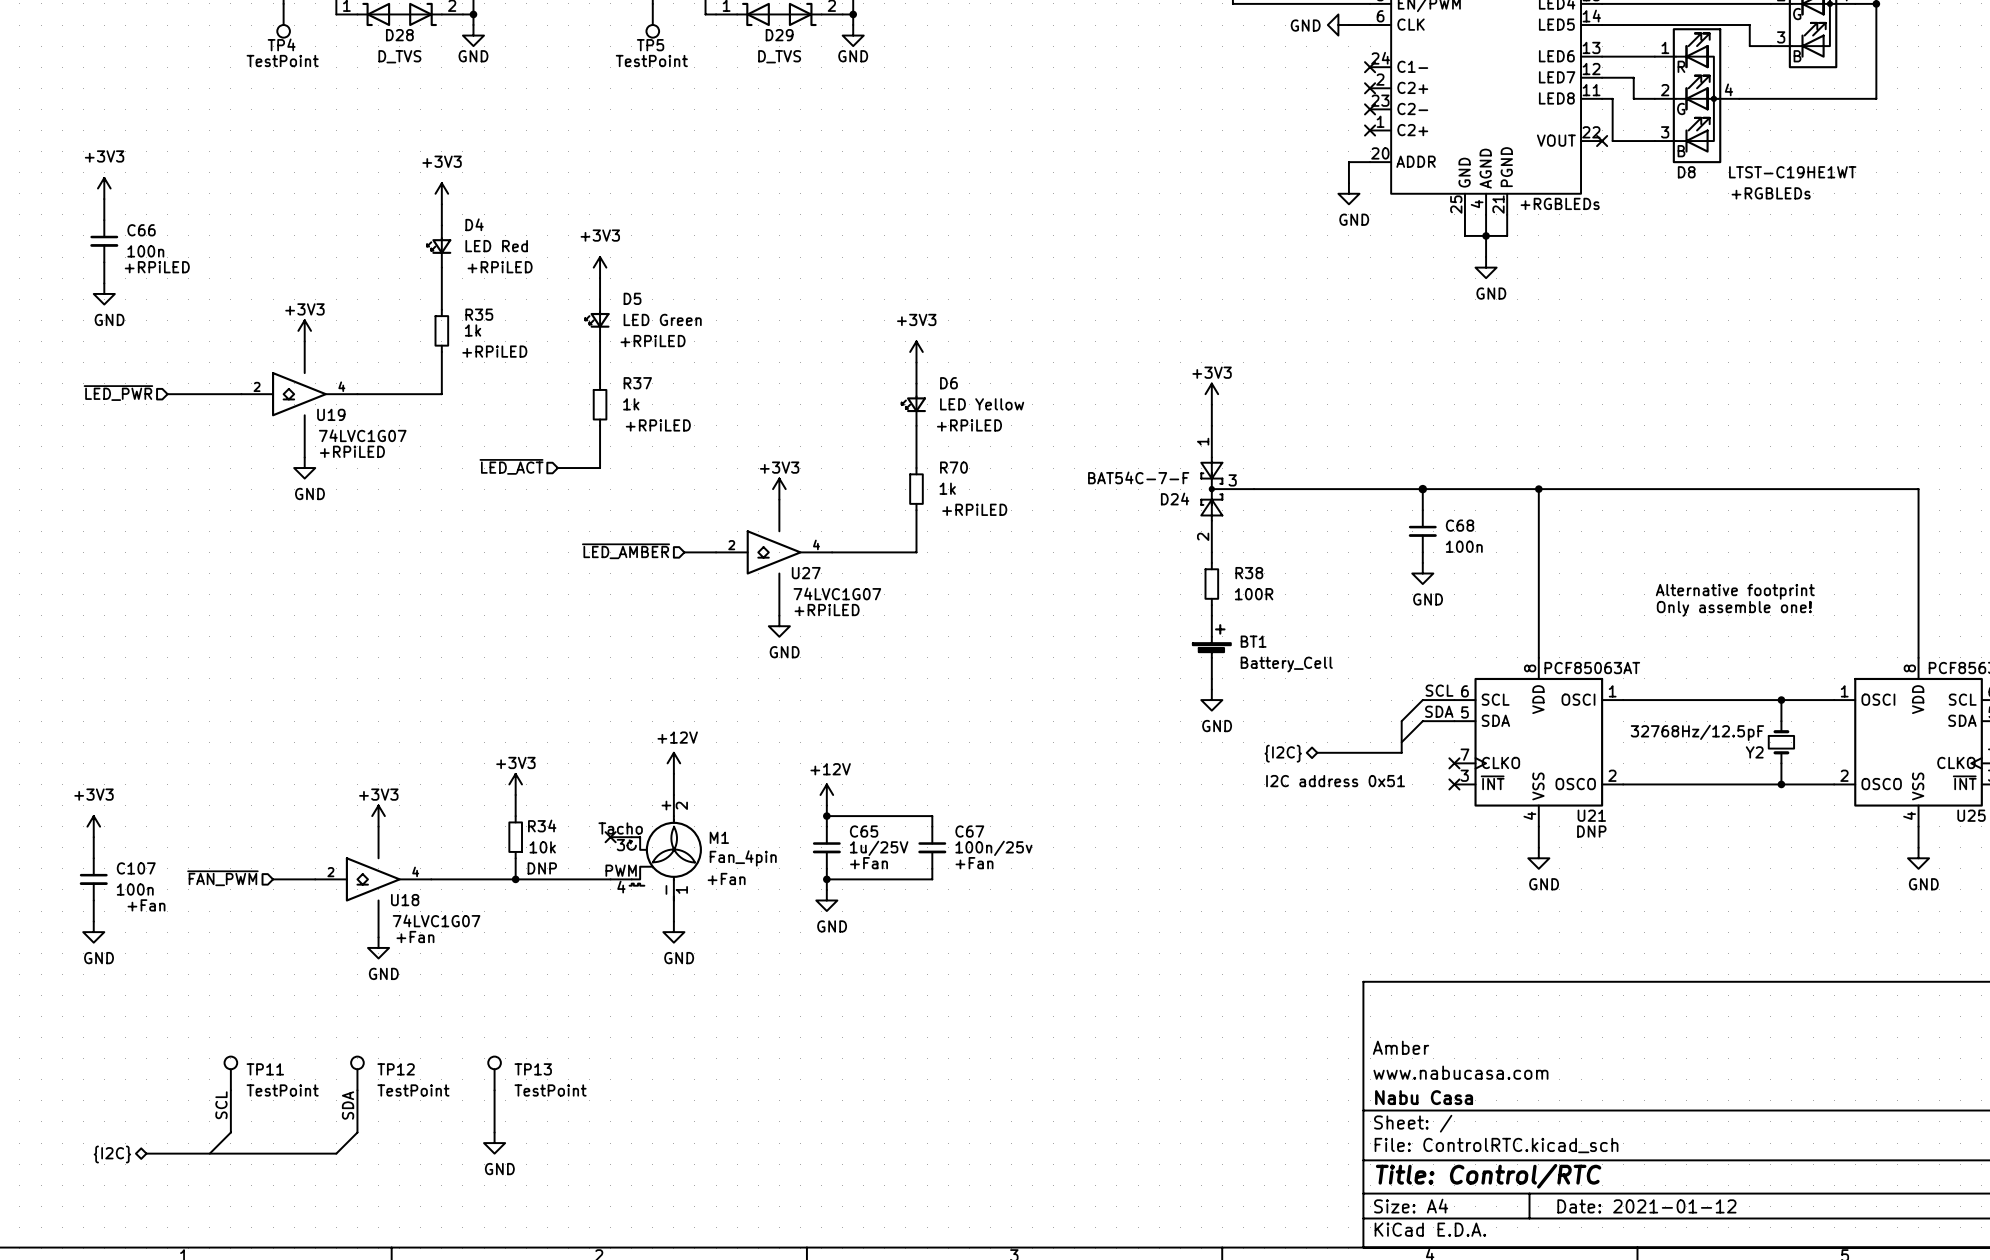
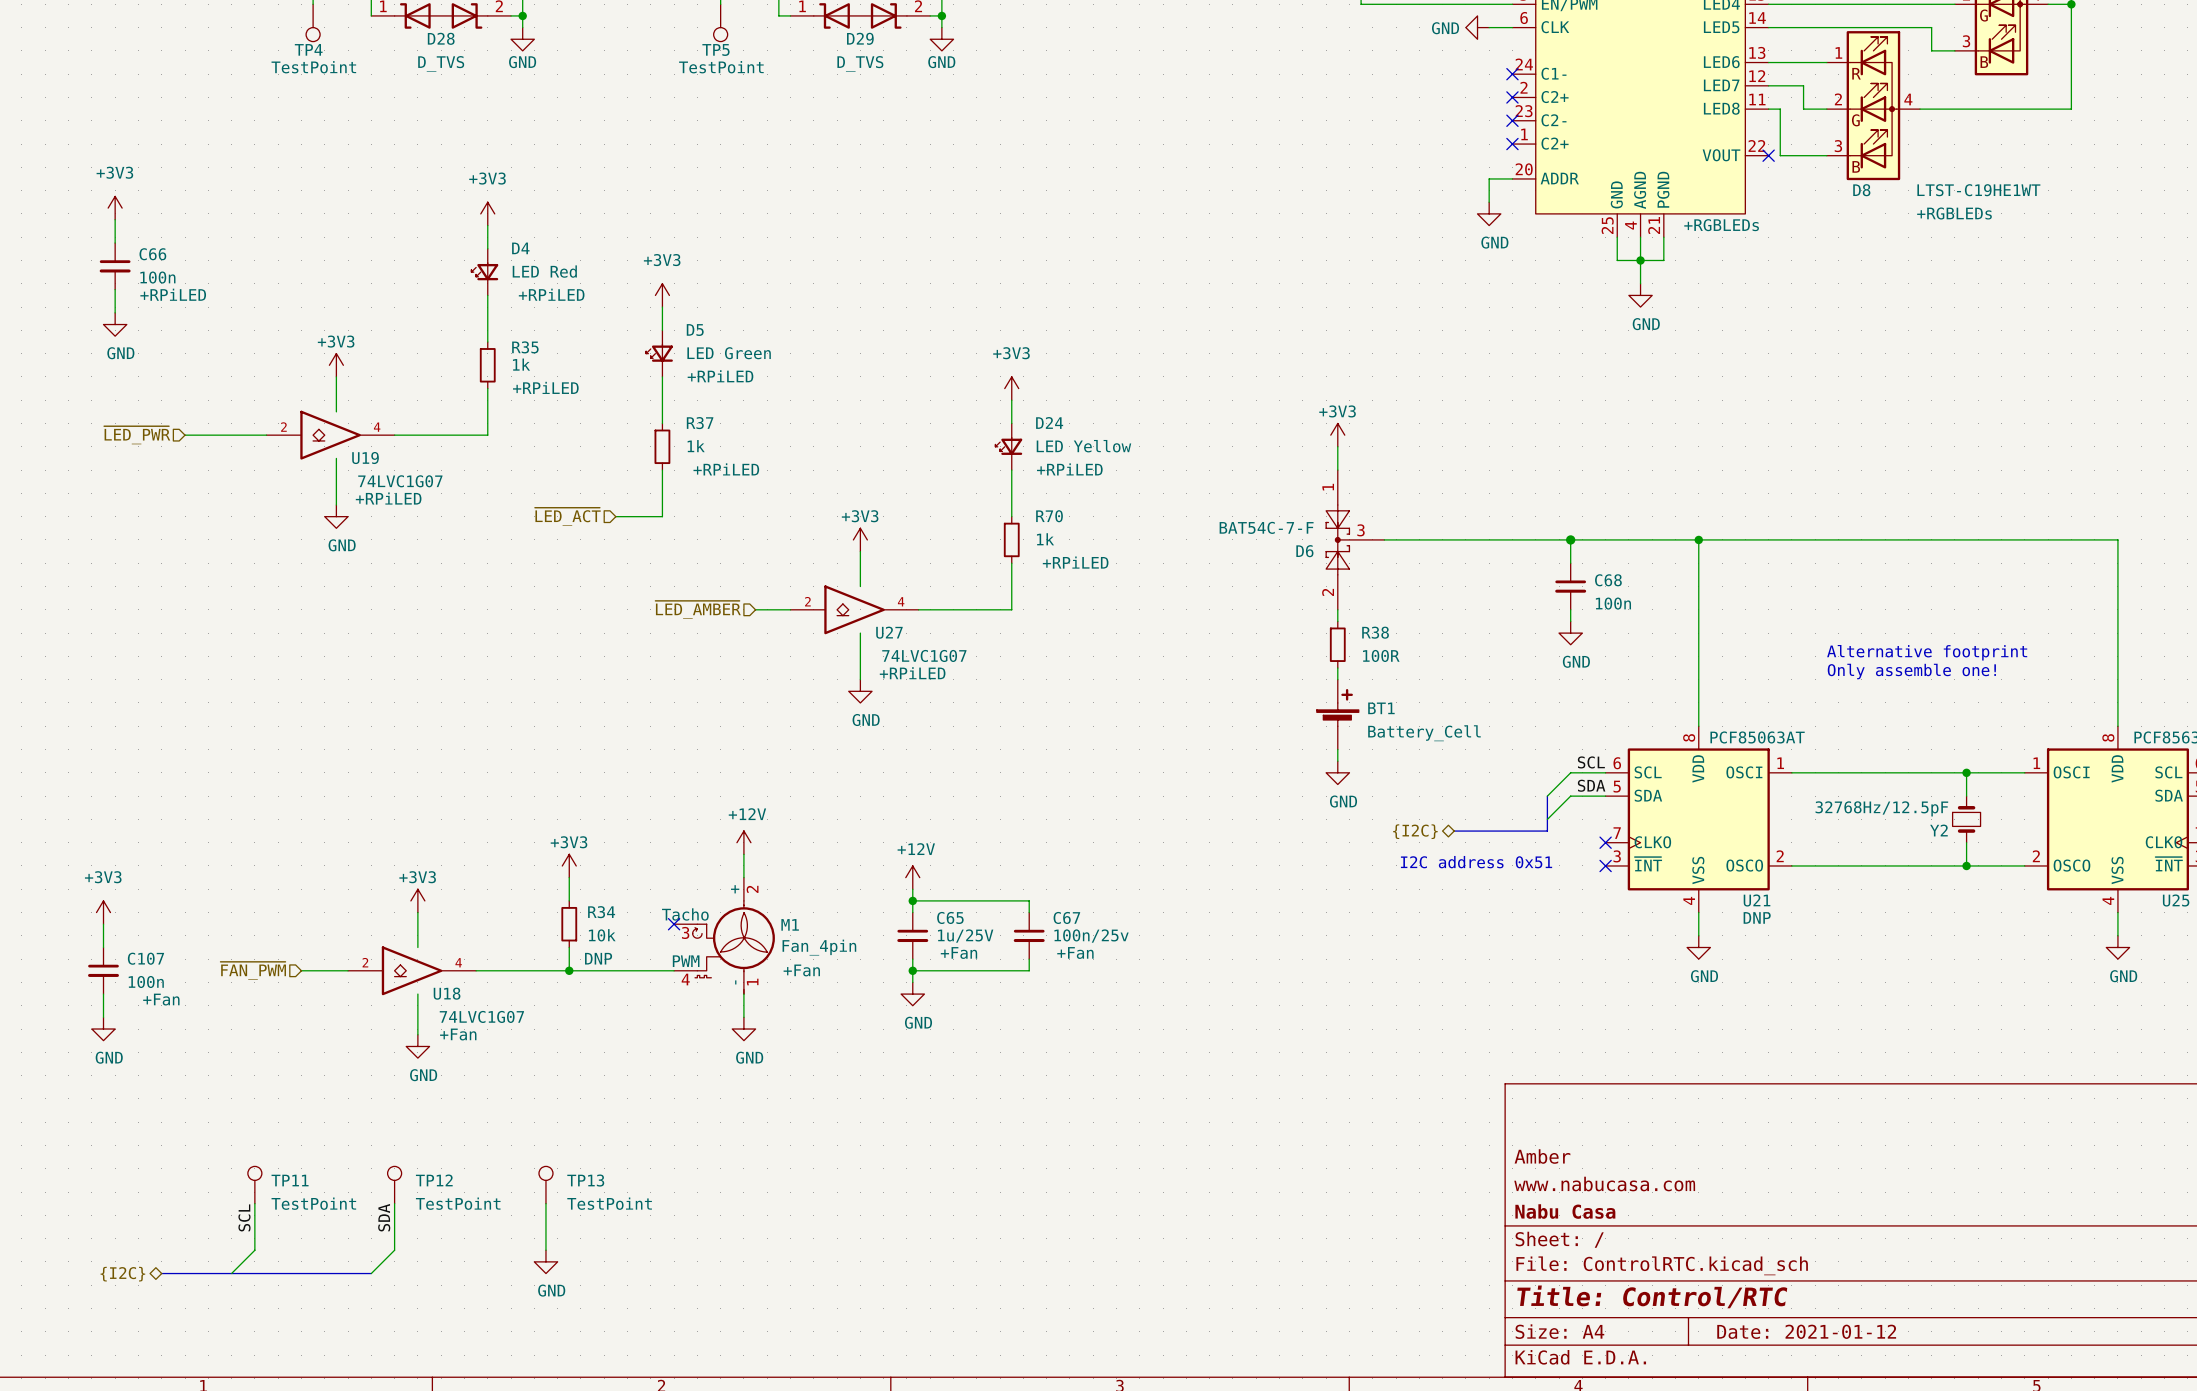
D6 name: D6 (948, 383) -> D24 (1049, 422)
D24 name: D24 (1175, 499) -> D6 (1304, 551)

